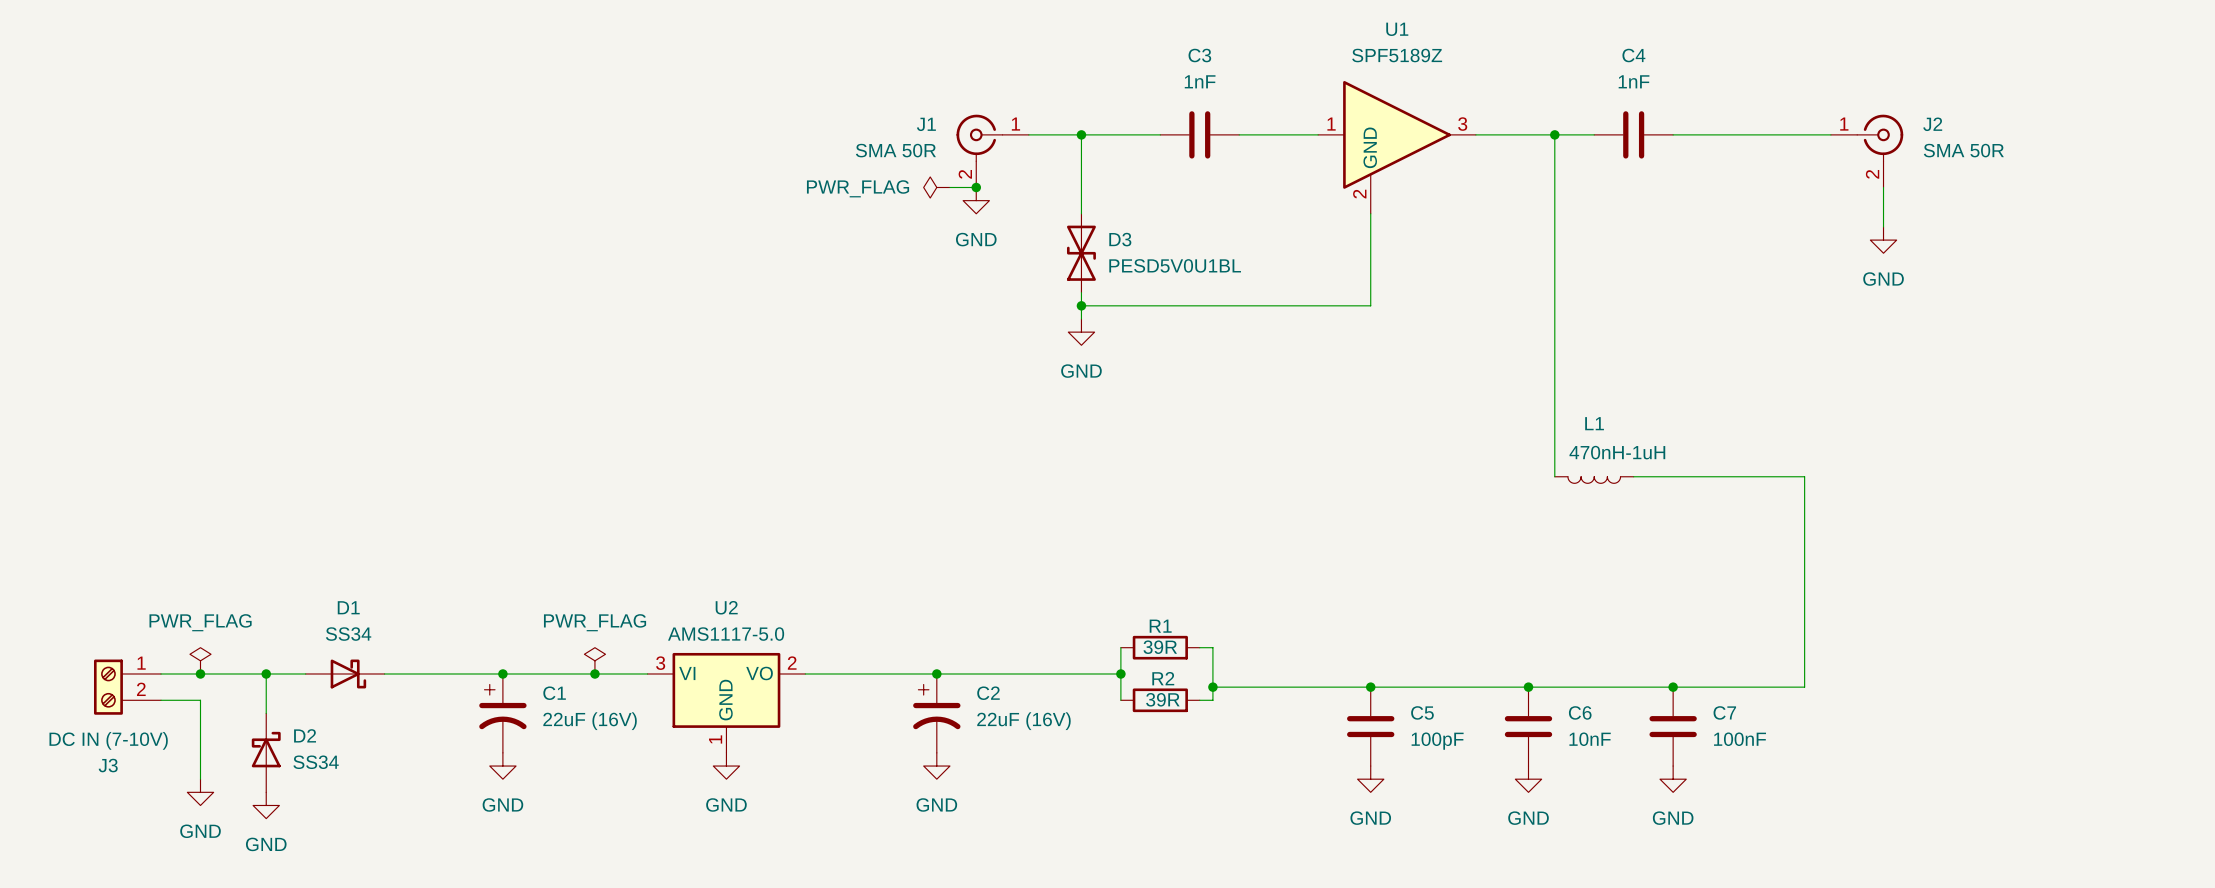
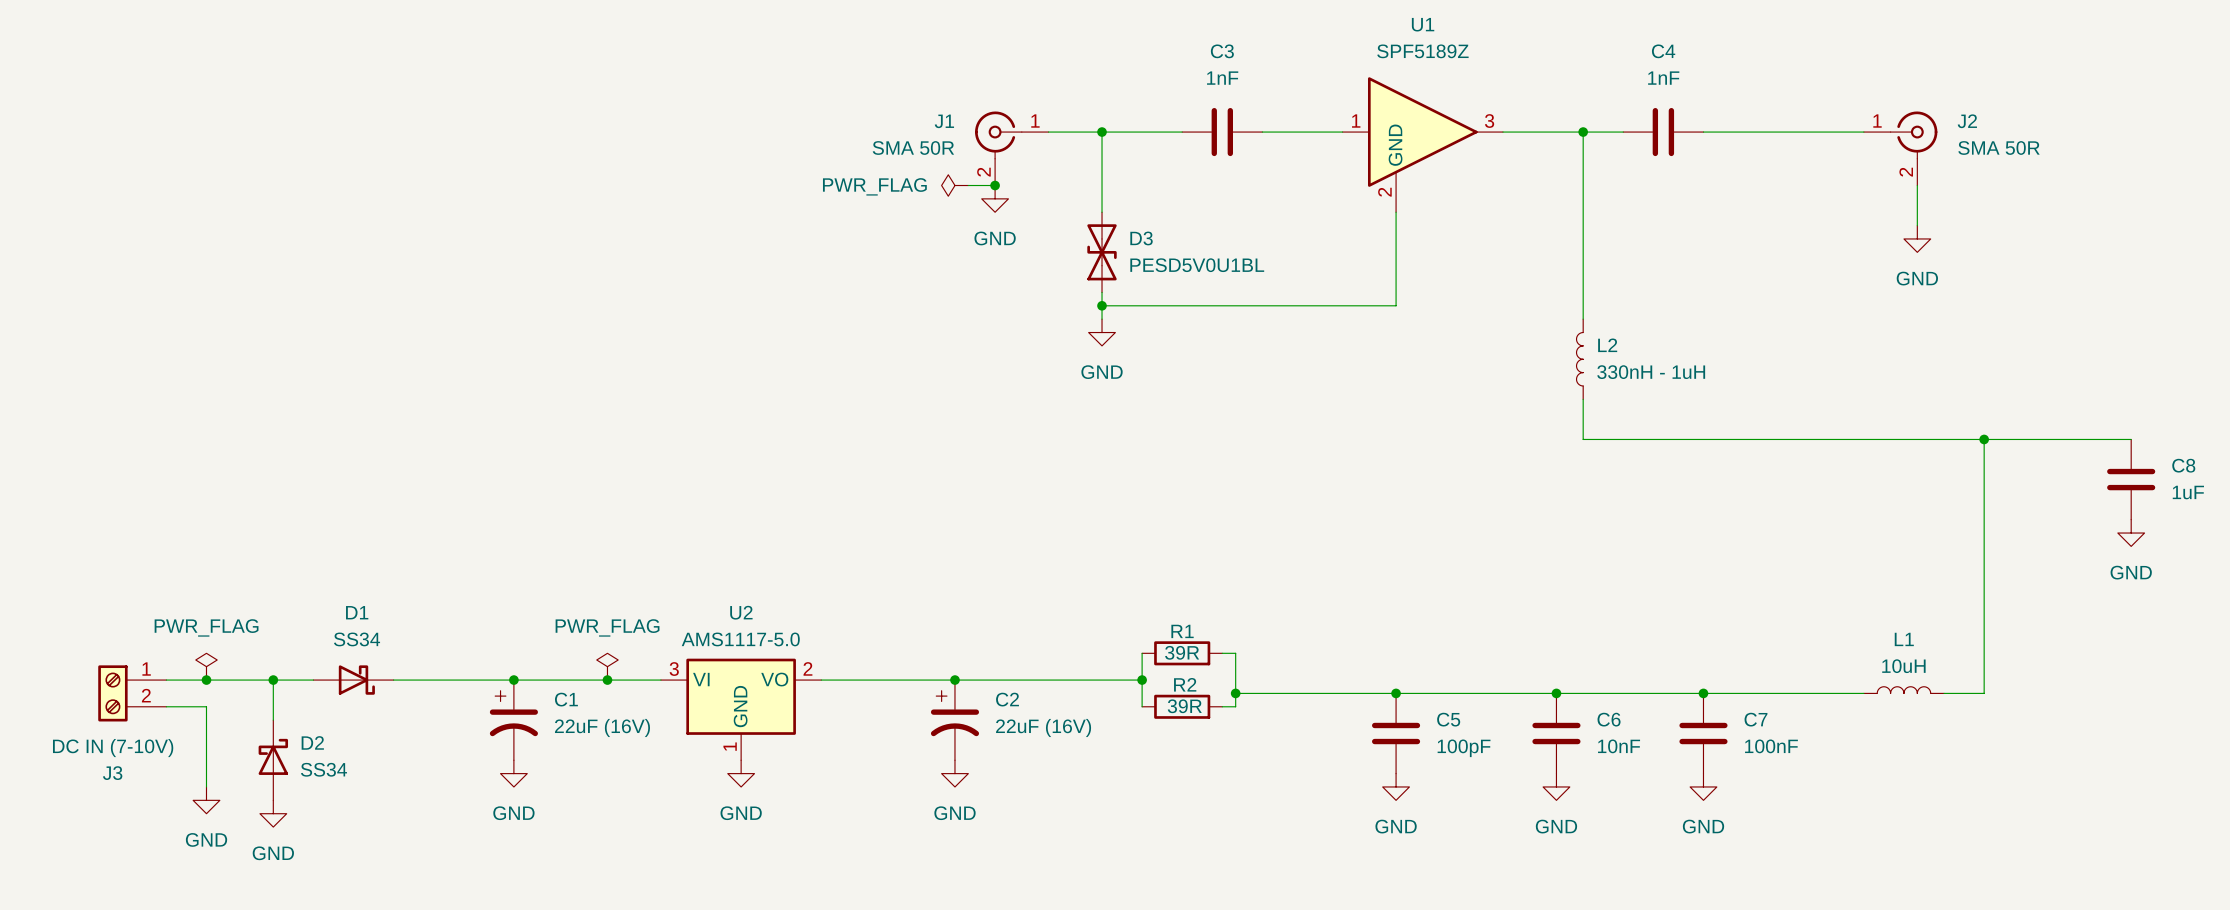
wire: (1554, 318) (1554, 397) -> none
L2: none -> 330nH - 1uH (1579, 359)
wire: (1554, 437) (1554, 476) -> (1583, 439) (2131, 439)
wire: none -> (1984, 439) (1984, 693) (1944, 693)
junction: none -> (1984, 439)
L1 value: 470nH-1uH (1617, 452) -> 10uH (1903, 666)
wire: (1633, 476) (1804, 476) (1804, 687) -> (1863, 693) (1837, 693)
C8: none -> 1uF (2131, 479)
L1 rotation: 0° (1594, 480) -> 180° (1903, 690)
L1 position: (1594, 480) -> (1903, 690)
power symbol: none -> GND (2131, 533)

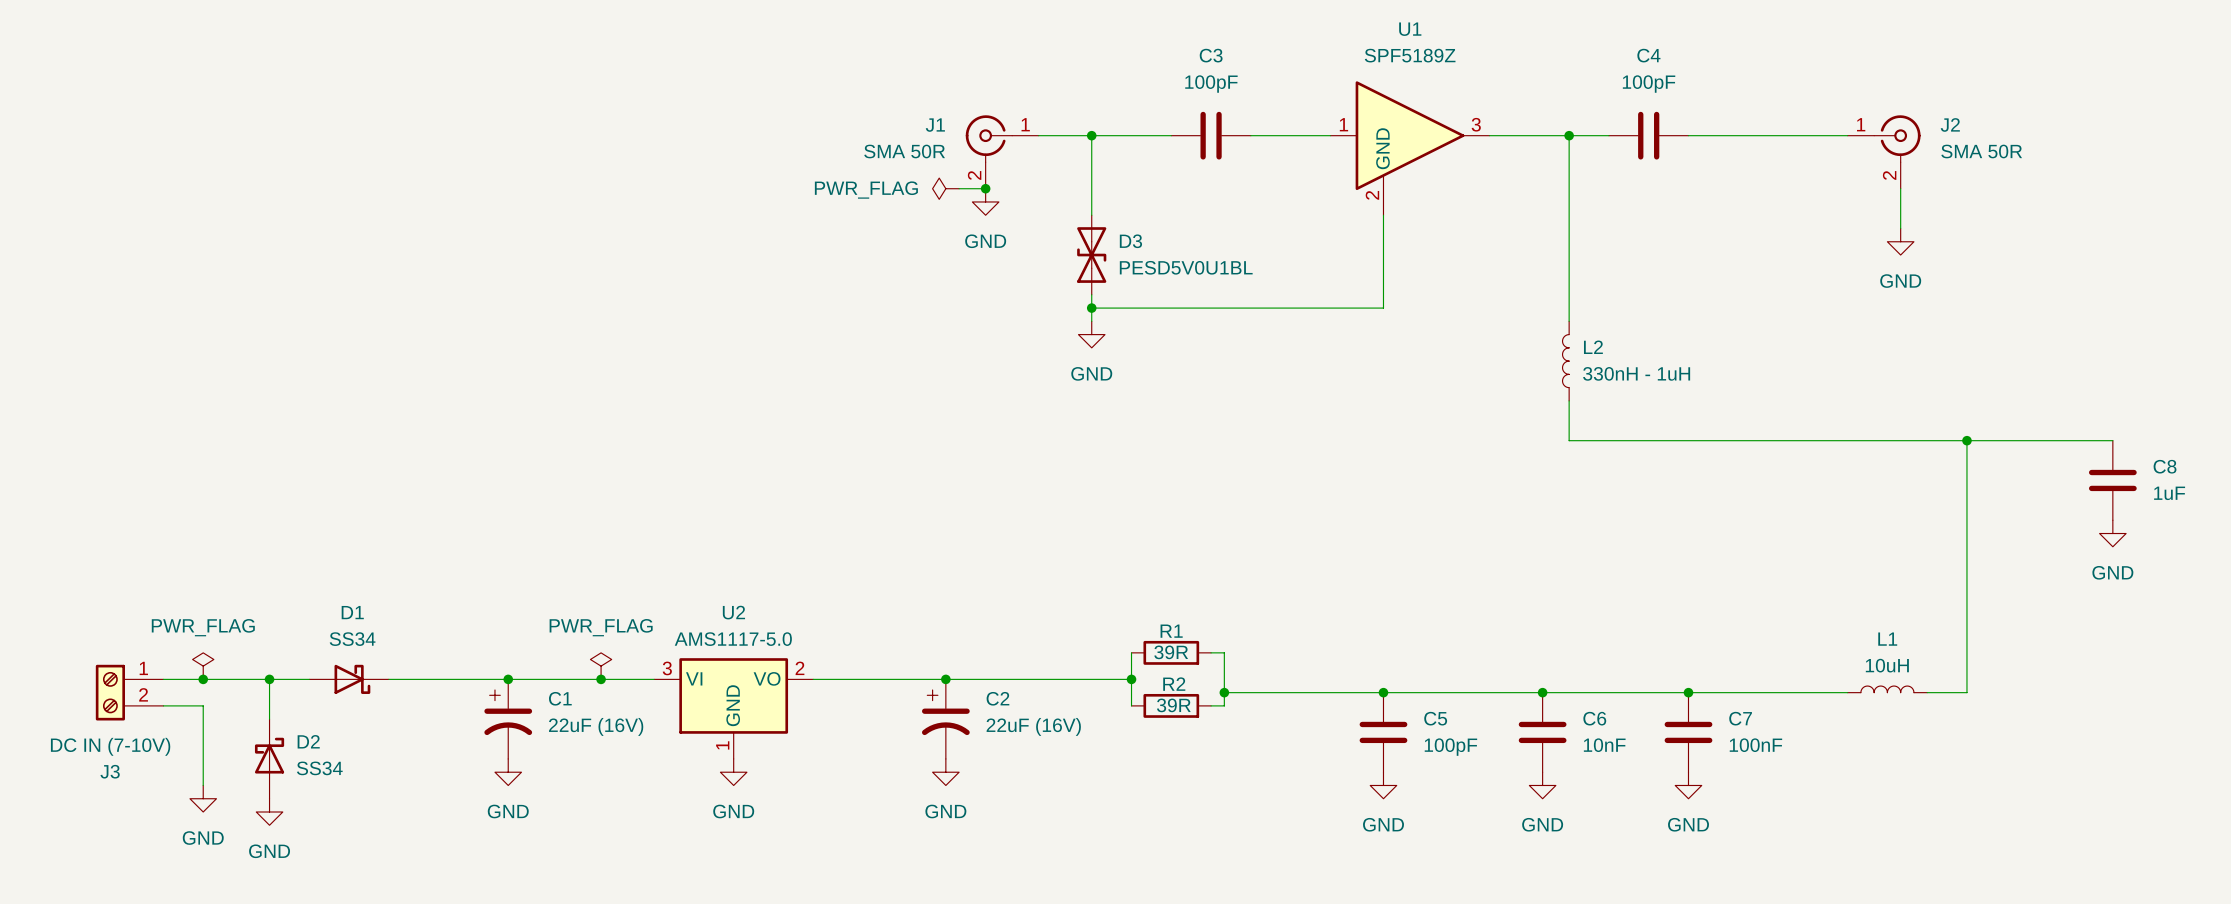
C3 value: 1nF (1222, 78) -> 100pF (1211, 84)
C4 value: 1nF (1663, 78) -> 100pF (1649, 84)

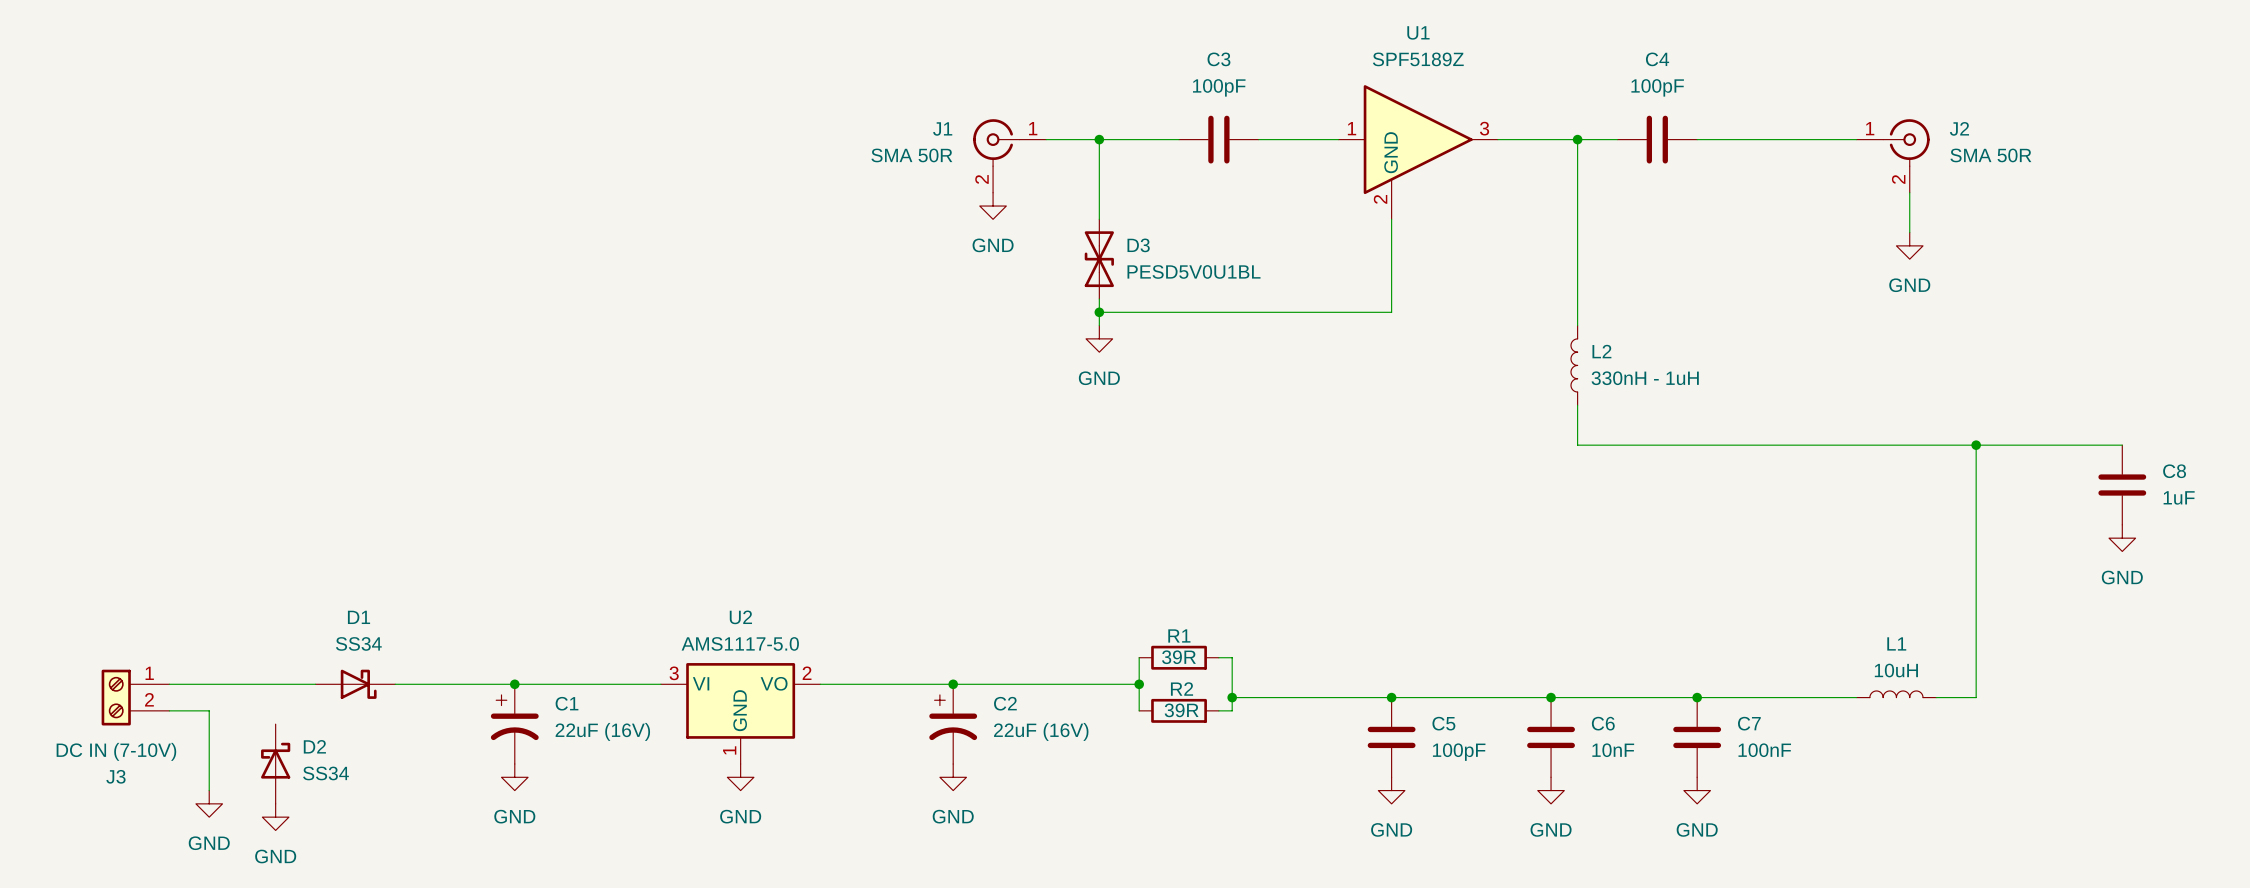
power symbol: PWR_FLAG (945, 188) -> none
wire: (959, 188) (985, 188) -> none
junction: (985, 188) -> none
power symbol: PWR_FLAG (203, 666) -> none
power symbol: PWR_FLAG (601, 666) -> none
junction: (203, 679) -> none
wire: (269, 679) (269, 719) -> none
junction: (269, 679) -> none
junction: (601, 679) -> none

